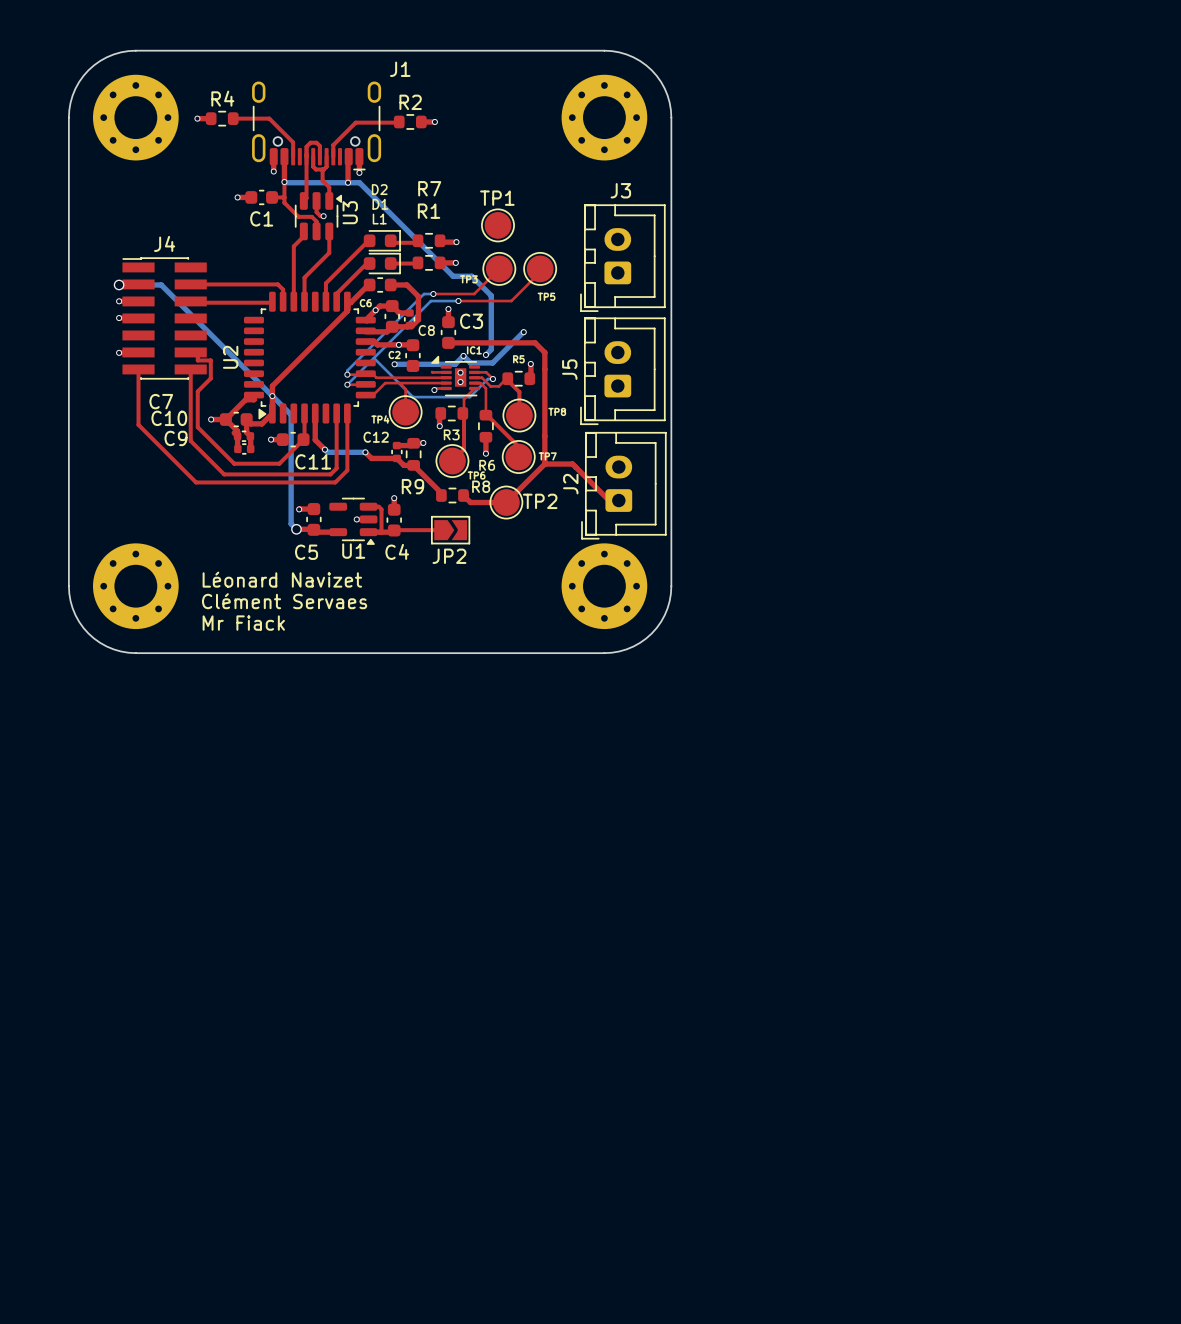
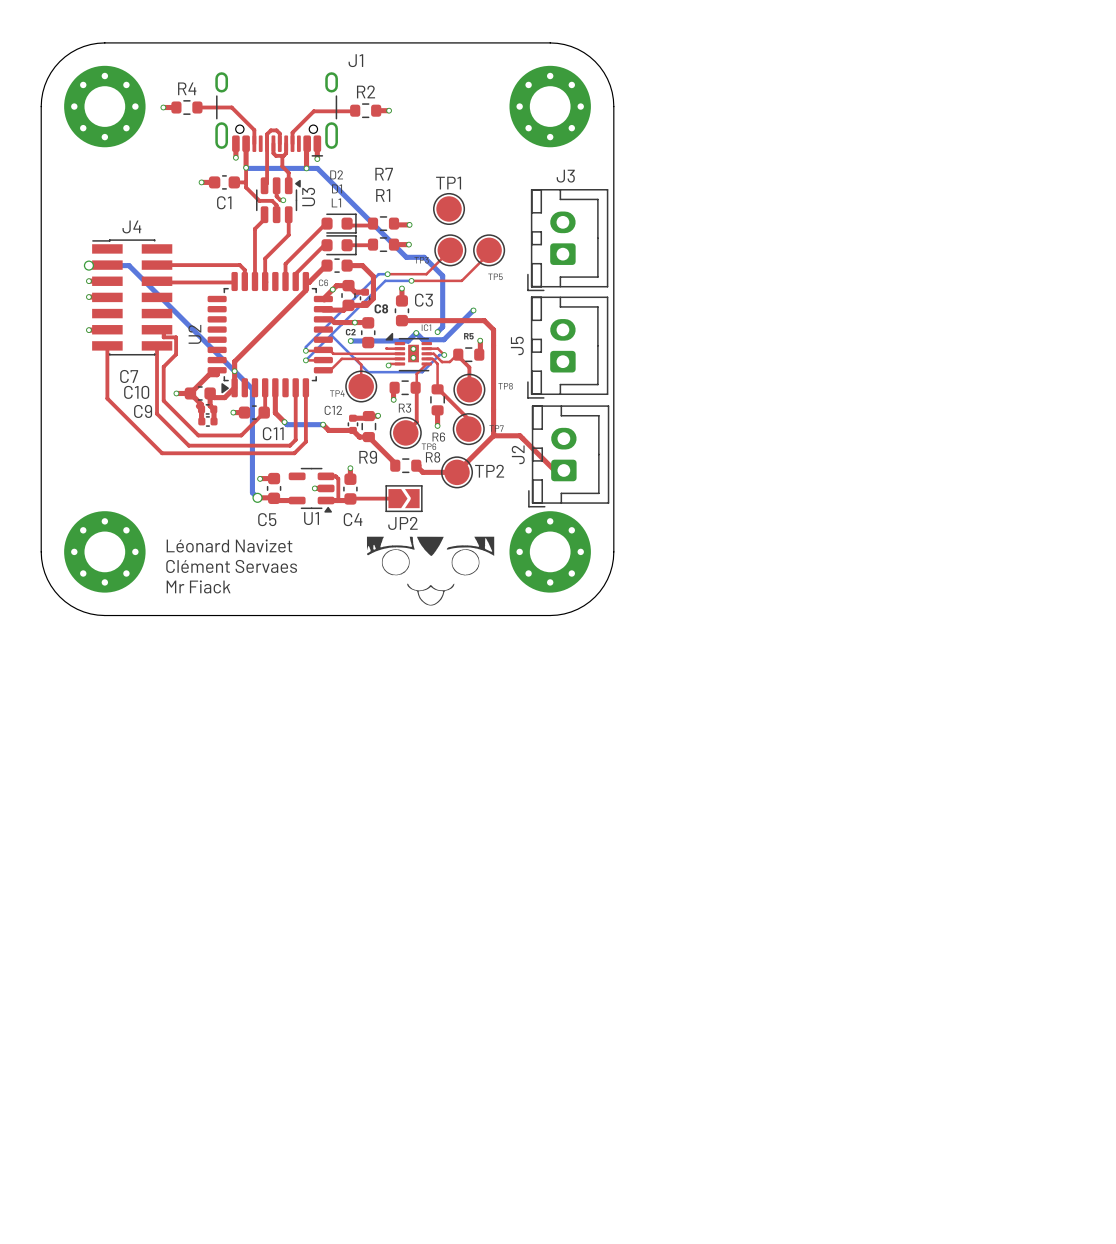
drawing: none -> [366, 536, 495, 606]

